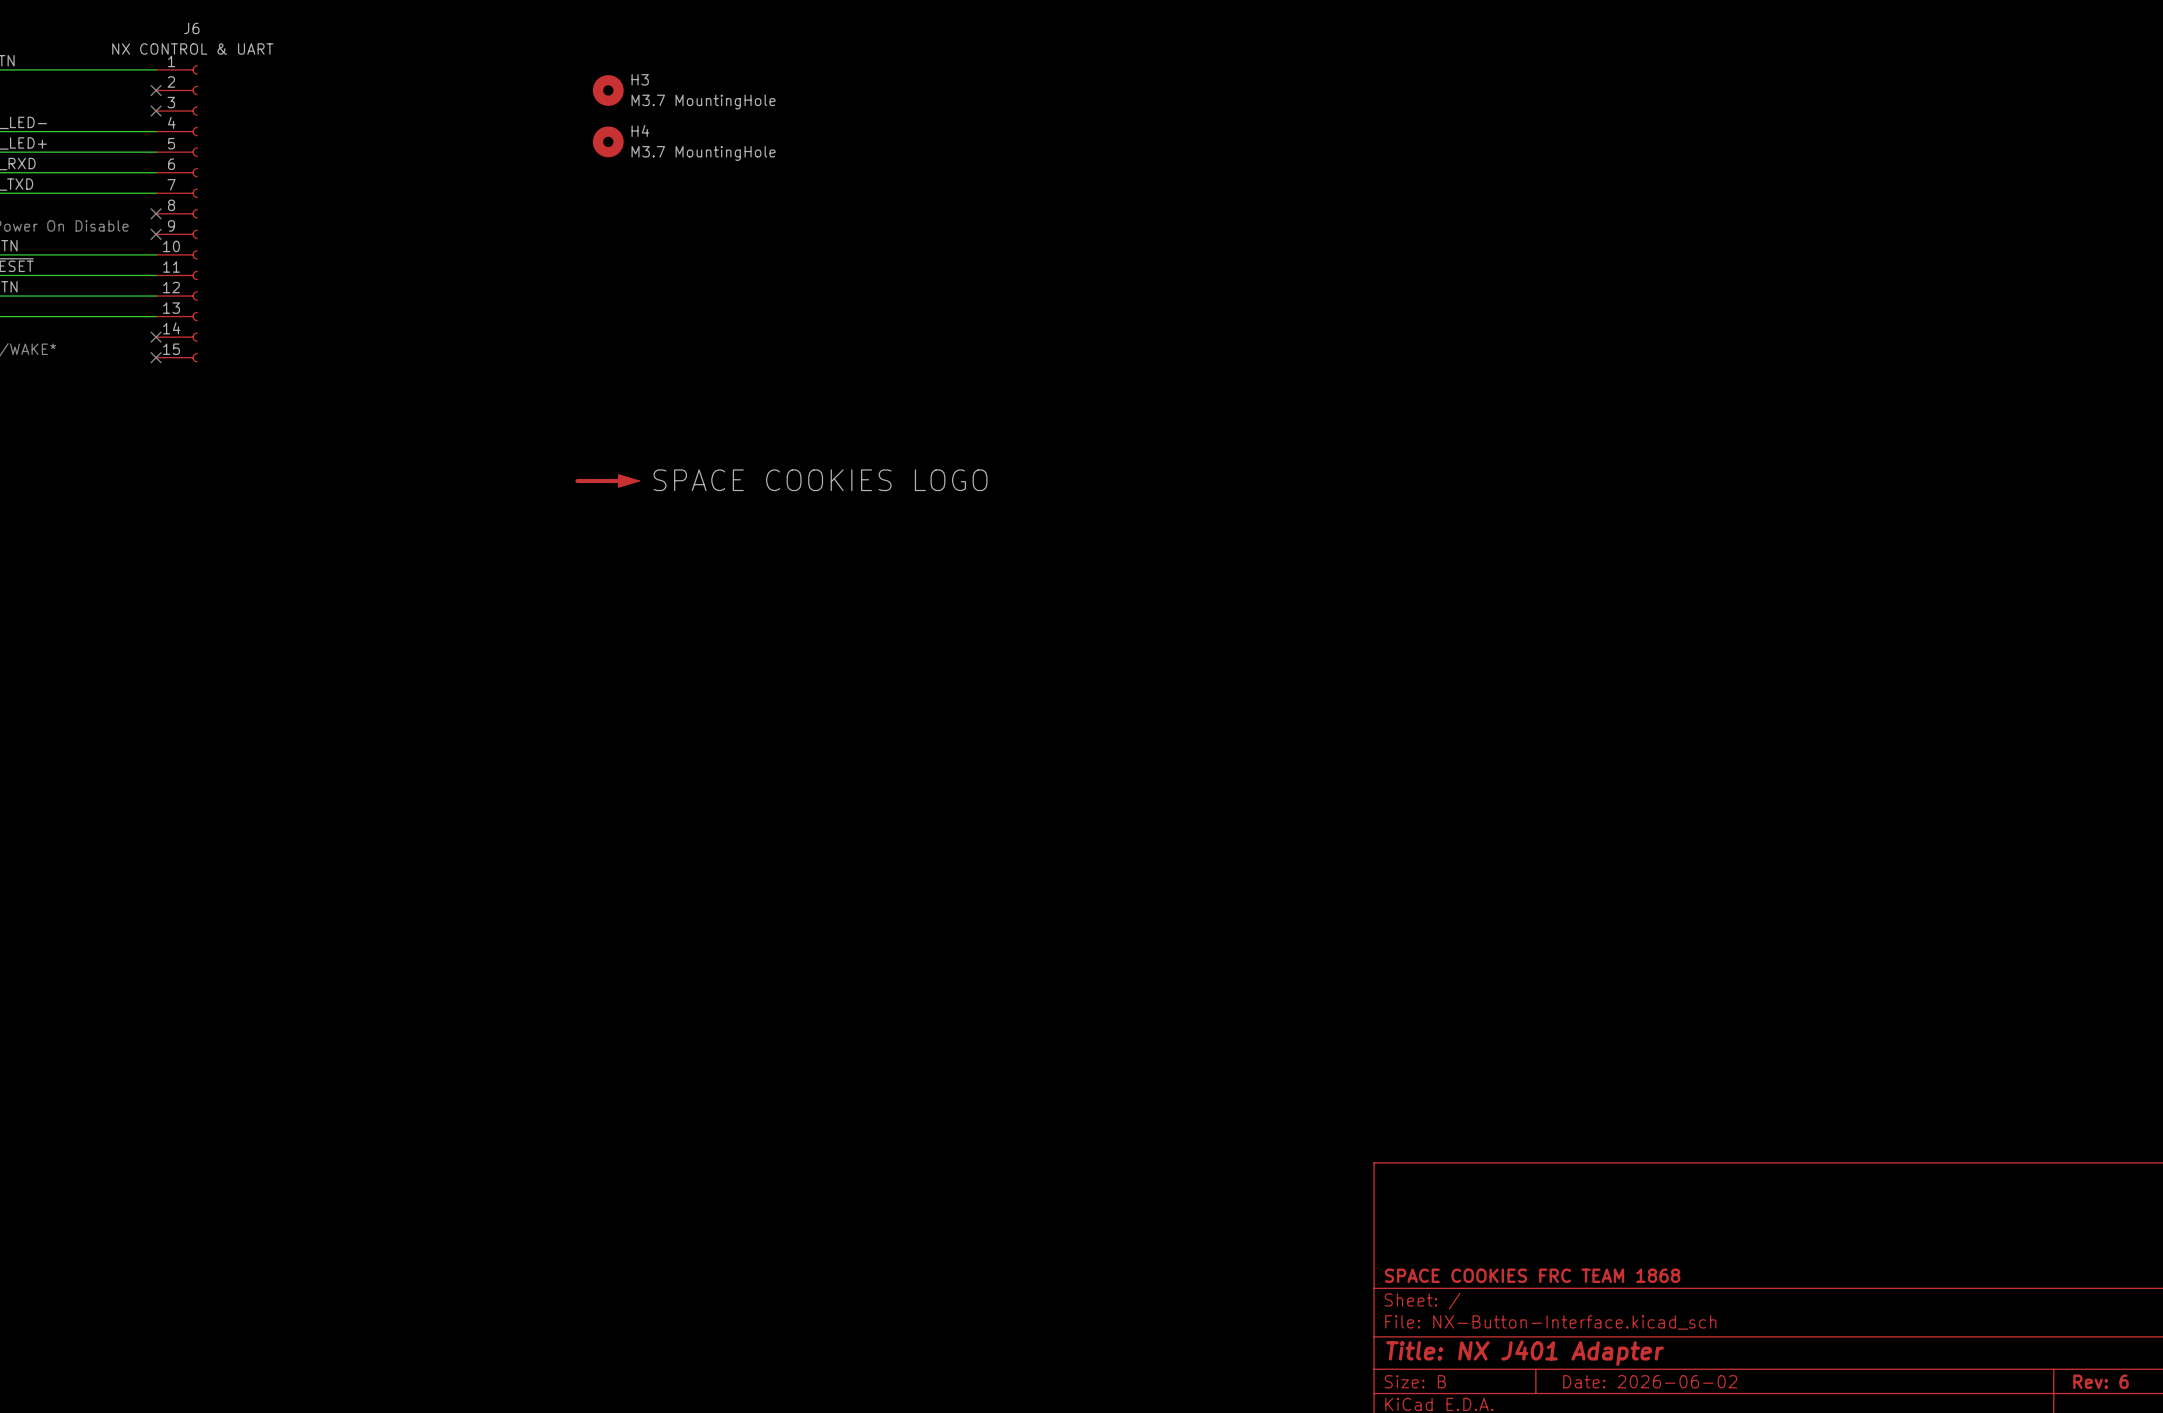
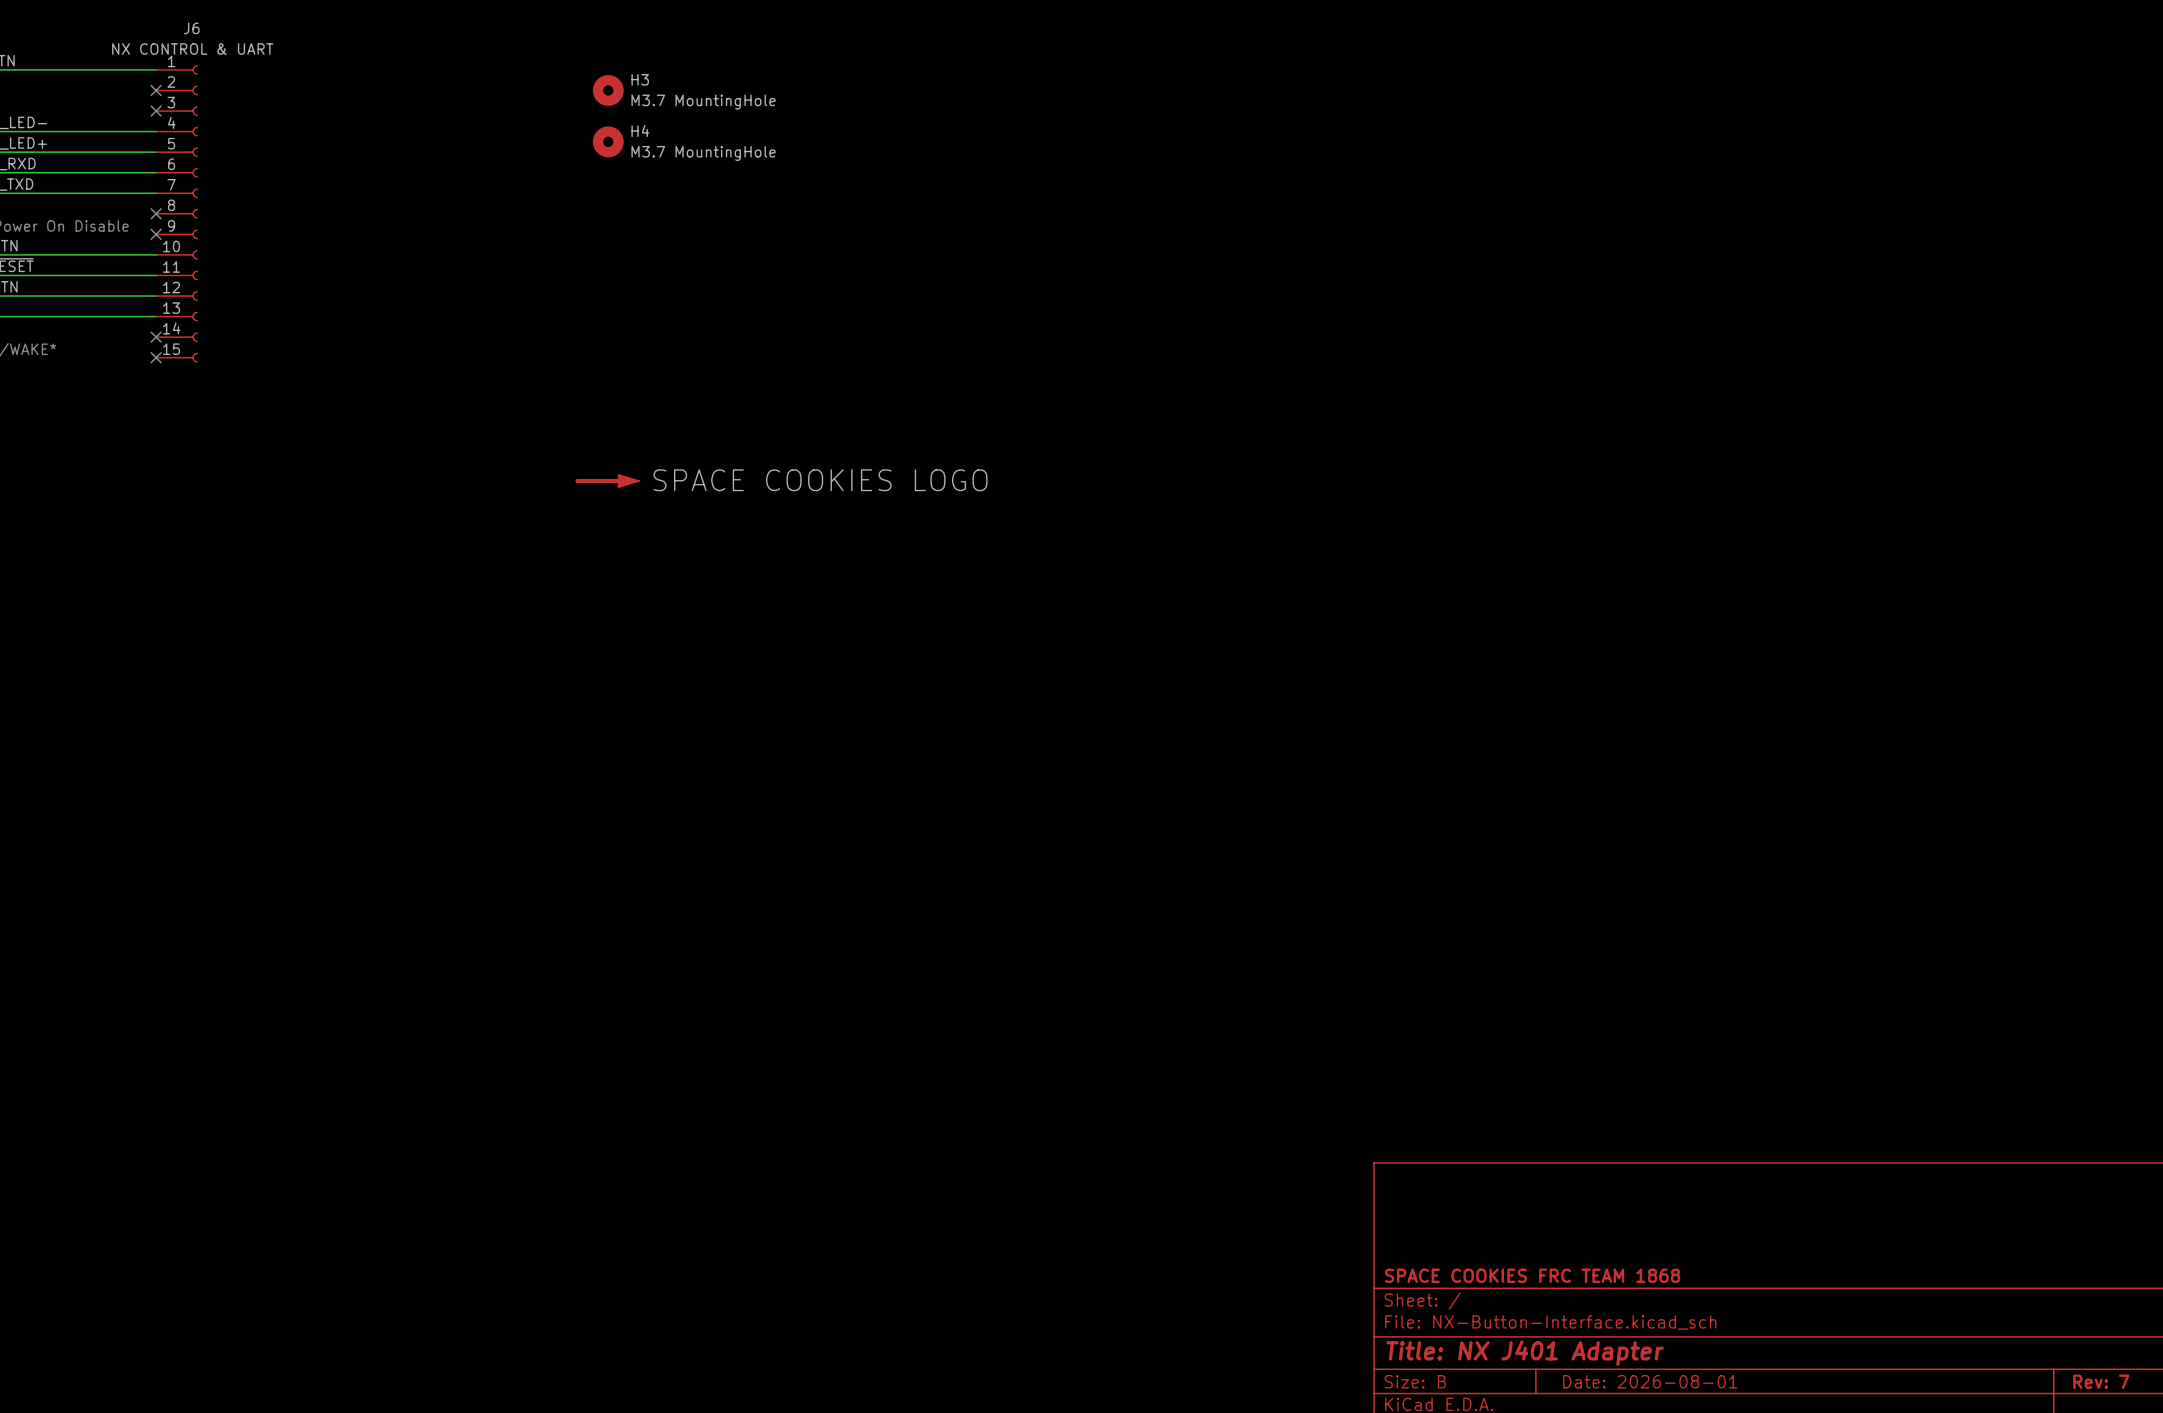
title block: Date: 2026-06-02 (1650, 1381) -> Date: 2026-08-01 (1650, 1381)
title block: Rev: 6 (2101, 1381) -> Rev: 7 (2101, 1381)

